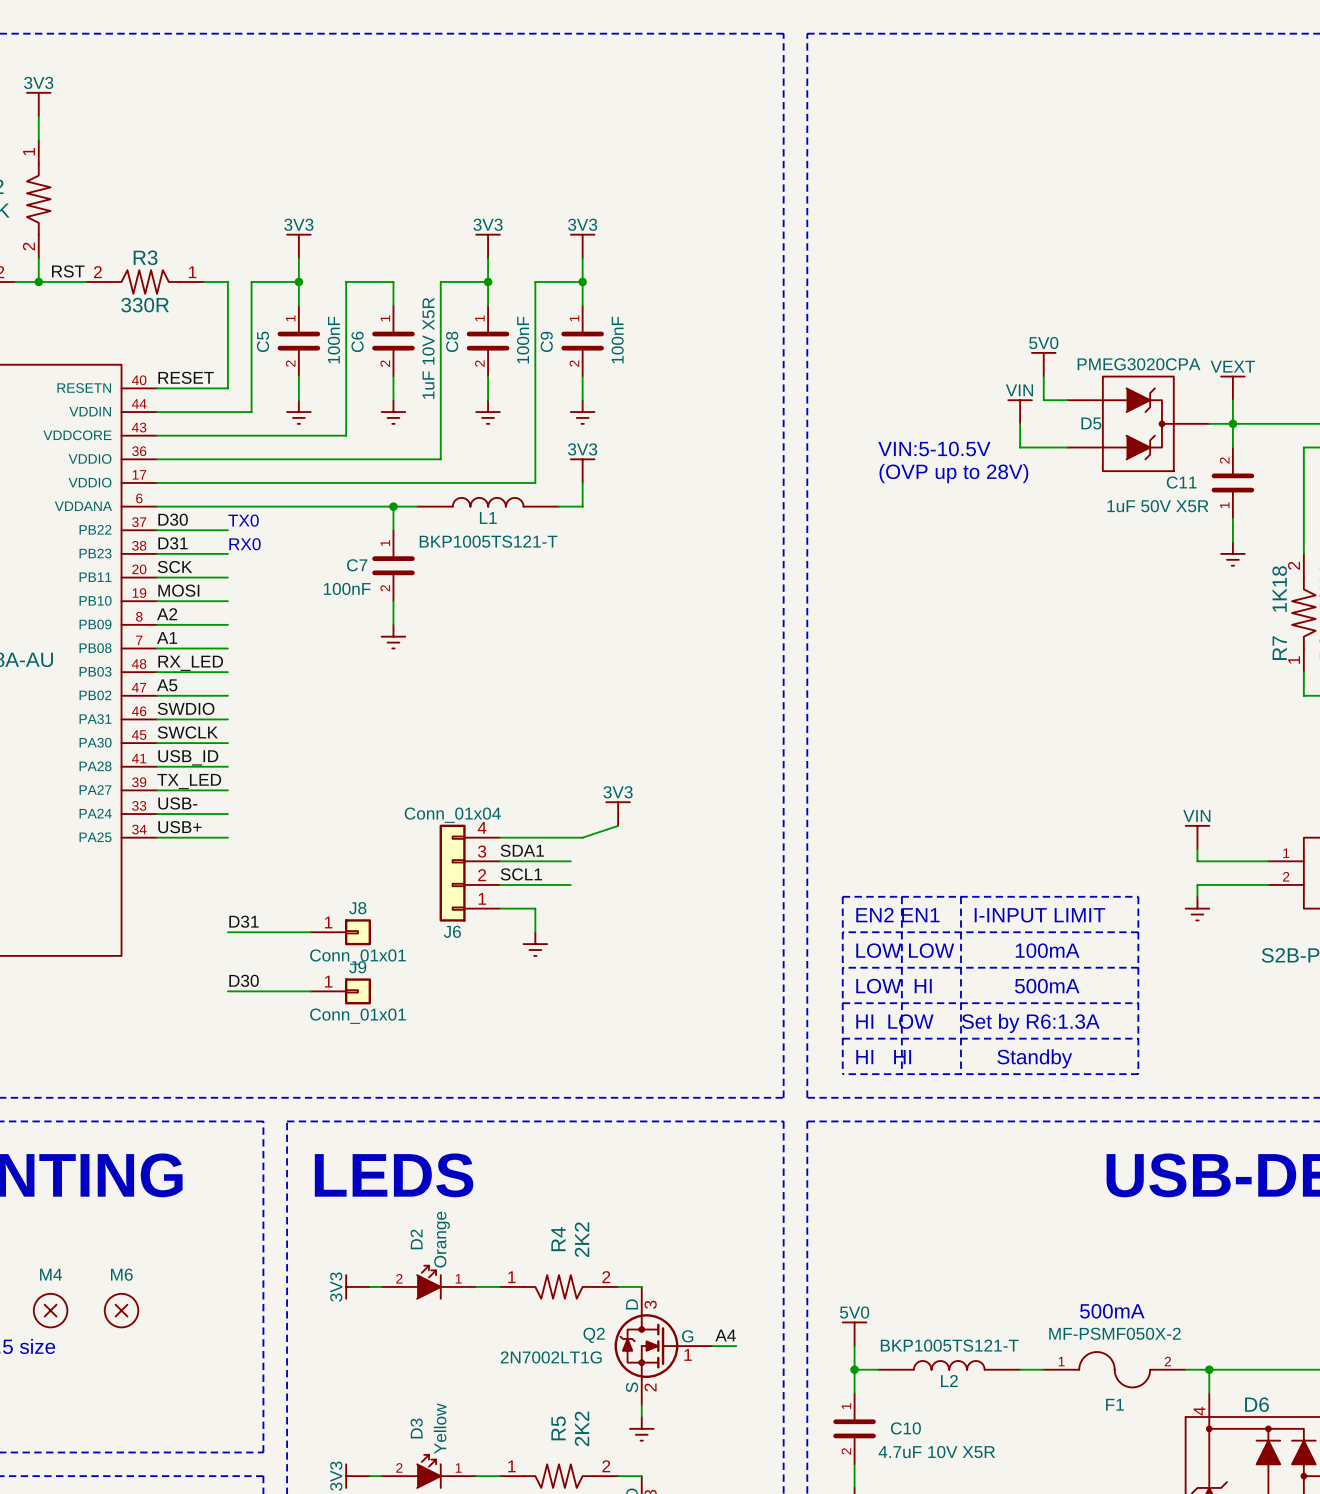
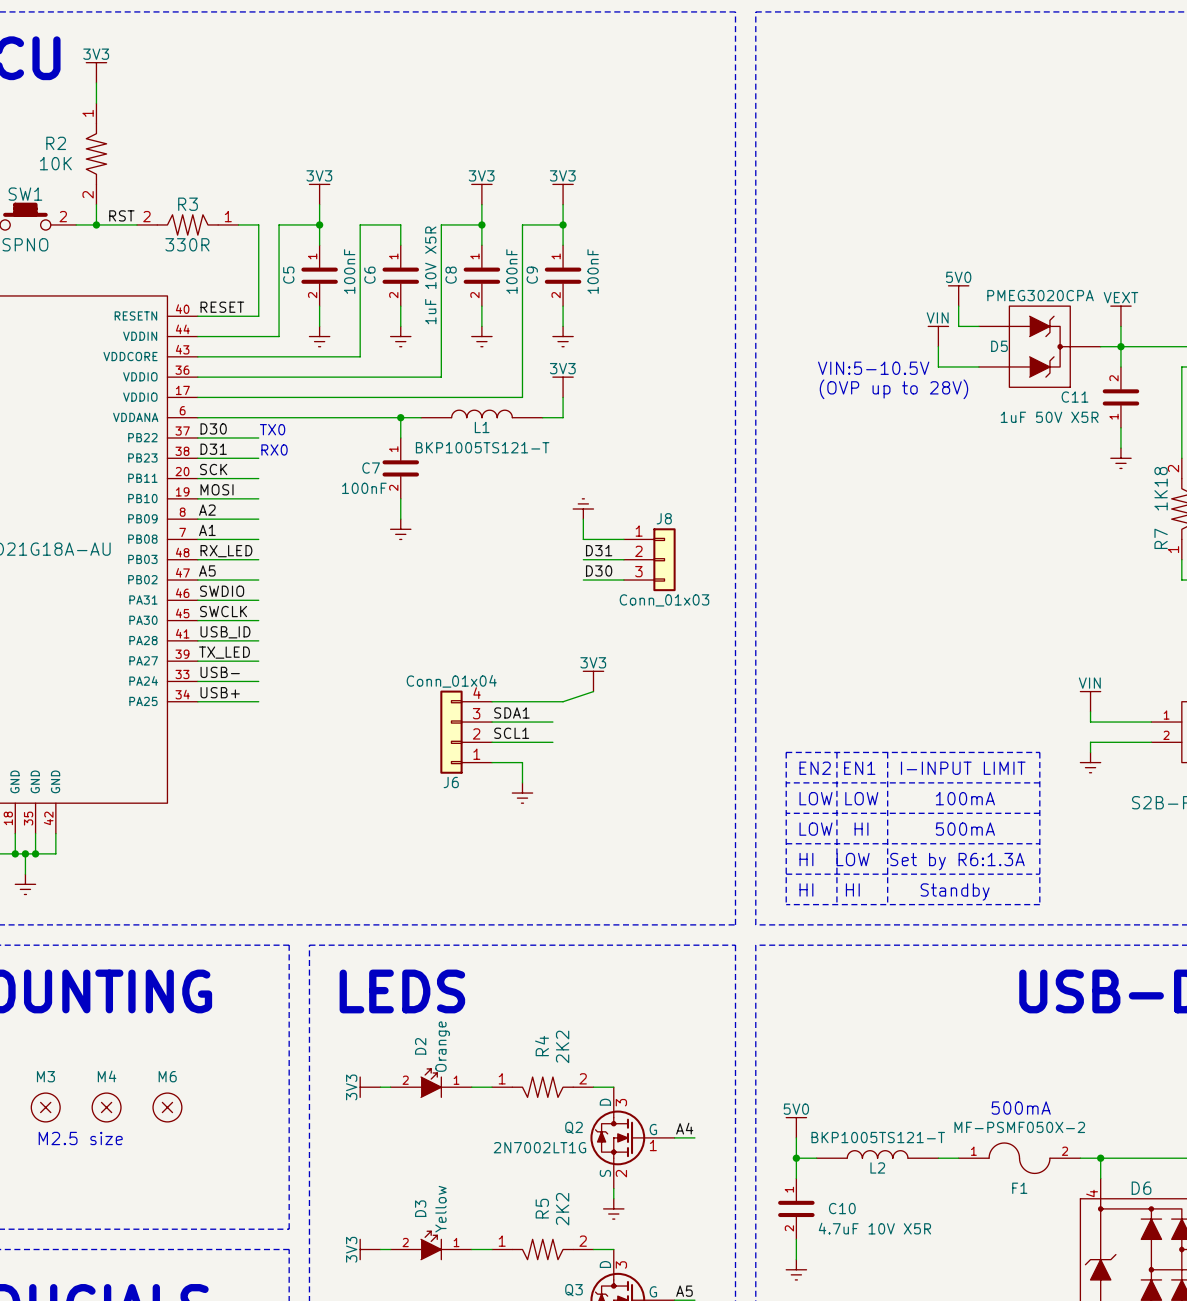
power symbol: none -> (583, 509)
wire: none -> (583, 519) (583, 539) (623, 539)
label: none -> D31 (599, 550)
wire: none -> (583, 559) (623, 559)
label: none -> D30 (599, 570)
wire: none -> (583, 580) (623, 580)
J8 name position: J8 (357, 908) -> J8 (664, 518)
J8 symbol: [310, 919, 372, 946] -> [623, 528, 676, 592]
label: D31 (243, 921) -> none
wire: (227, 932) (310, 932) -> none
J8 value: Conn_01x01 (358, 957) -> Conn_01x03 (664, 600)
label: D30 (244, 980) -> none
wire: (227, 991) (310, 991) -> none
J9: Conn_01x01 (340, 991) -> none

